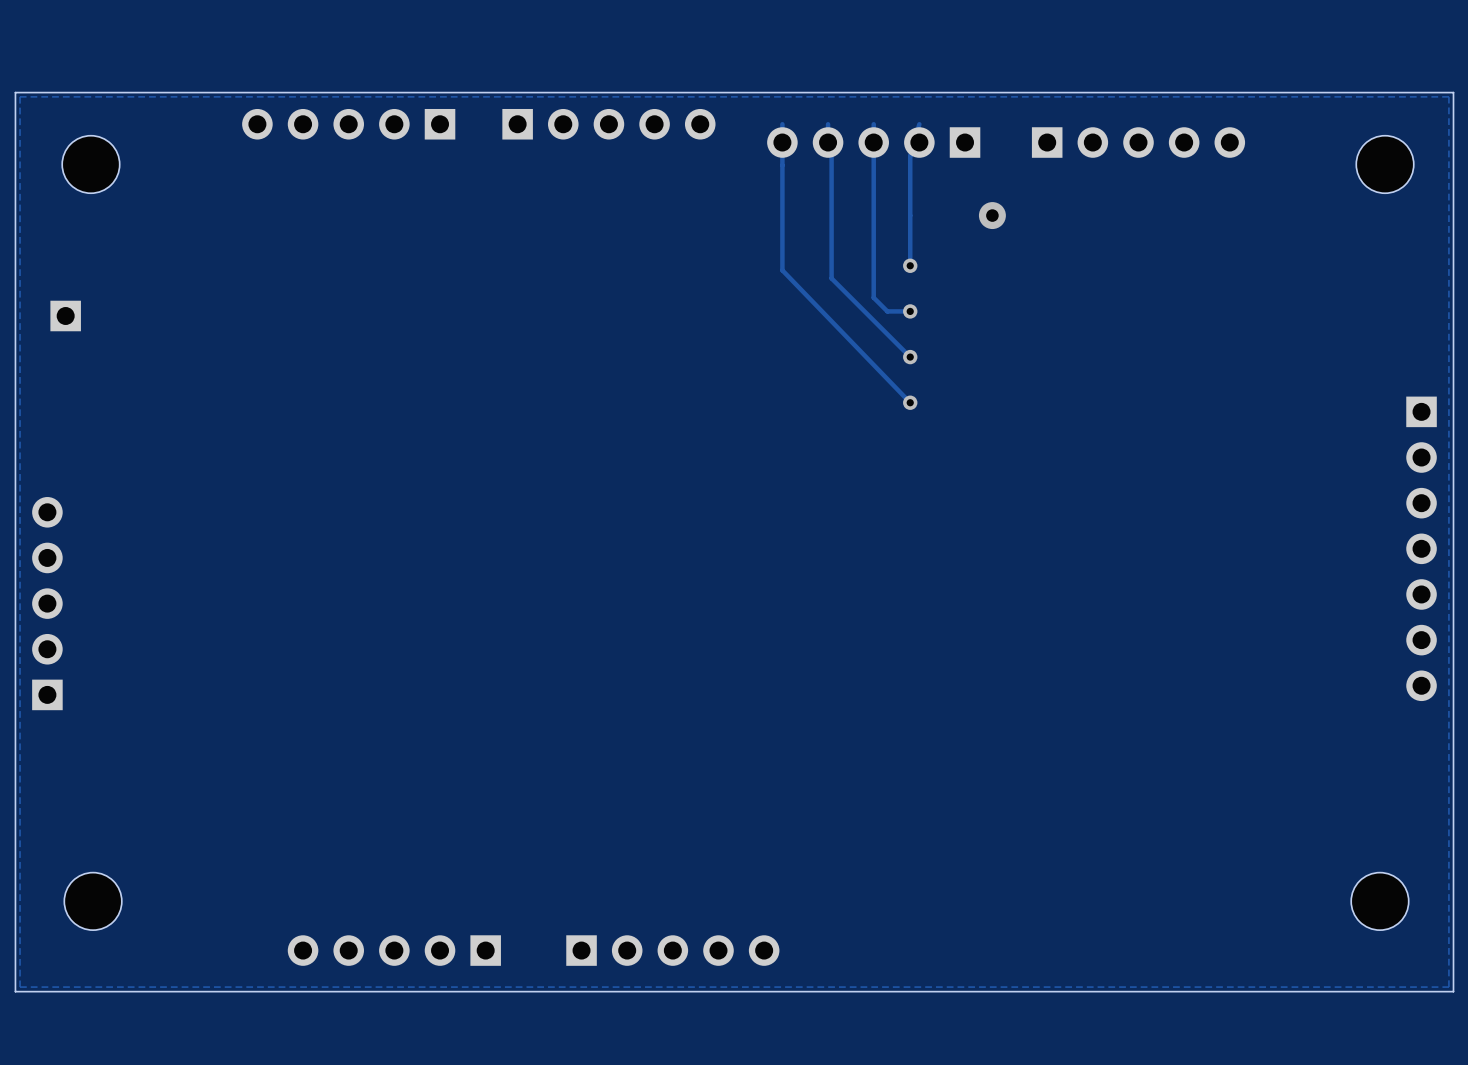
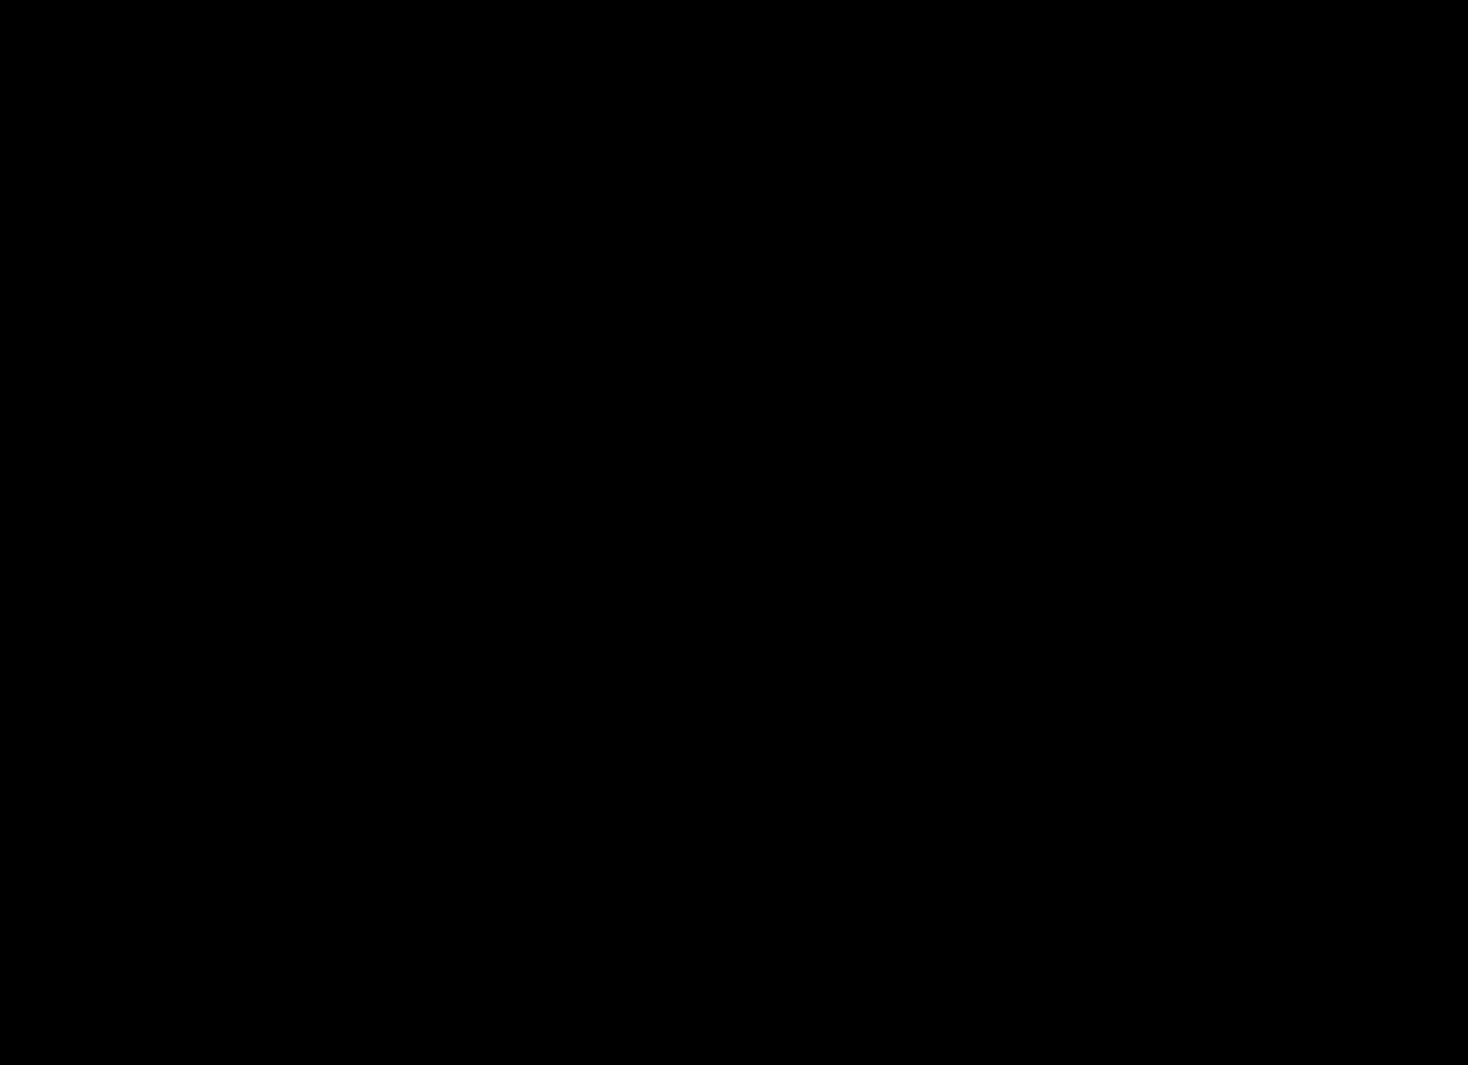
board edge: (1453, 92) (15, 92) (15, 991) (1453, 991) (1453, 92) -> none
zone outline: (1448, 96) (20, 96) (20, 987) (1448, 987) (1448, 96) -> none
part: (348, 124) -> none
part: (608, 124) -> none
track: (782, 124) (782, 270) (910, 402) -> none
track: (828, 124) (828, 145) (831, 149) (831, 278) (910, 357) -> none
track: (873, 124) (873, 297) (887, 311) (910, 311) -> none
track: (919, 124) (910, 156) (910, 265) -> none
part: (873, 142) -> none
part: (1138, 142) -> none
part: (90, 164) -> none
part: (1385, 164) -> none
via: (992, 215) -> none
via: (910, 265) -> none
via: (910, 311) -> none
part: (65, 315) -> none
via: (910, 357) -> none
via: (910, 402) -> none
part: (1421, 548) -> none
part: (47, 603) -> none
part: (93, 901) -> none
part: (1379, 901) -> none
part: (394, 950) -> none
part: (672, 950) -> none

